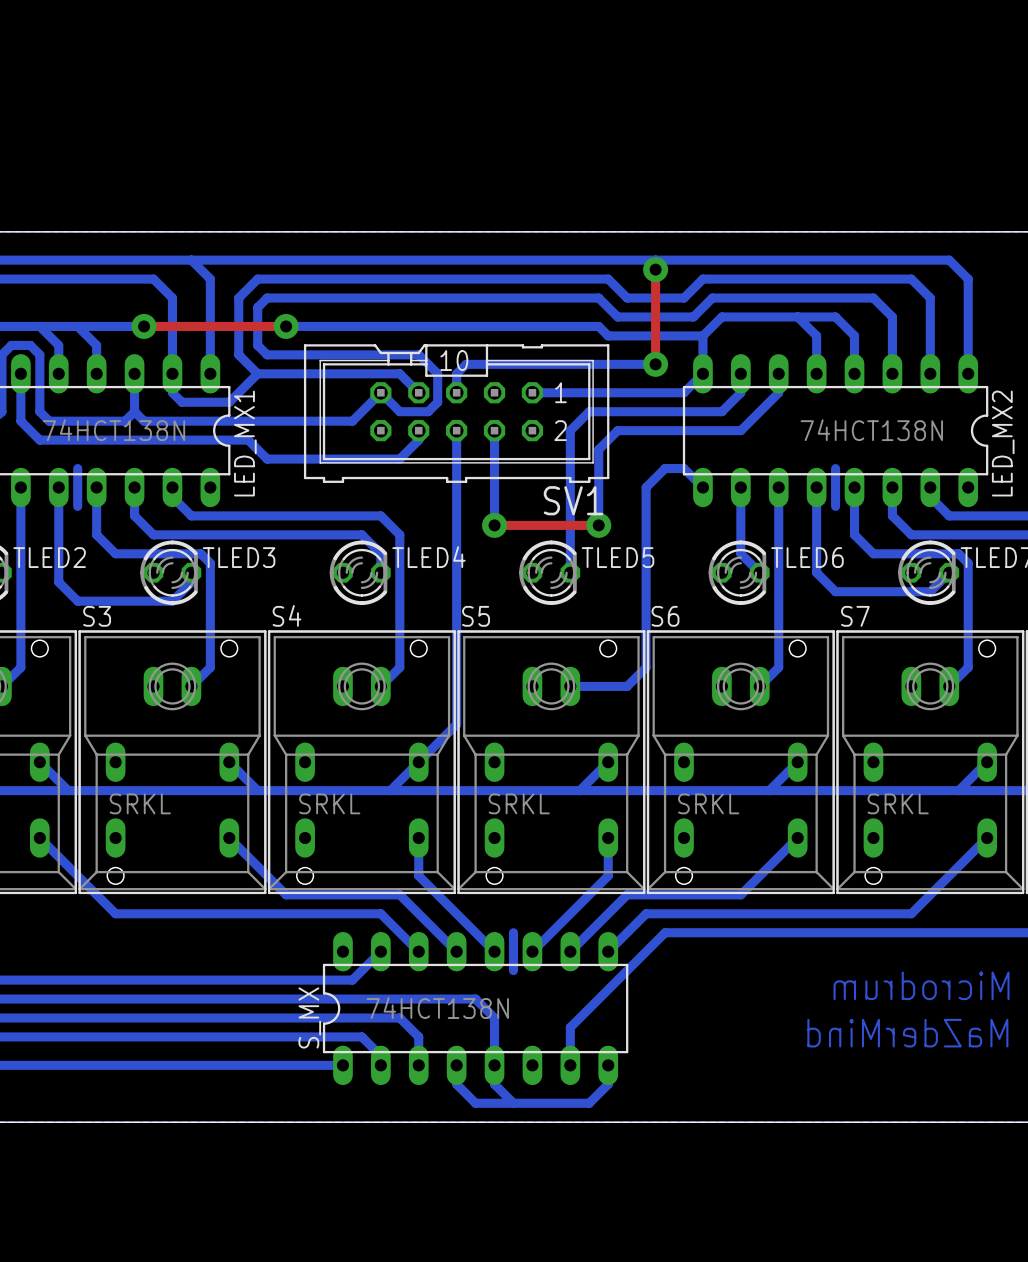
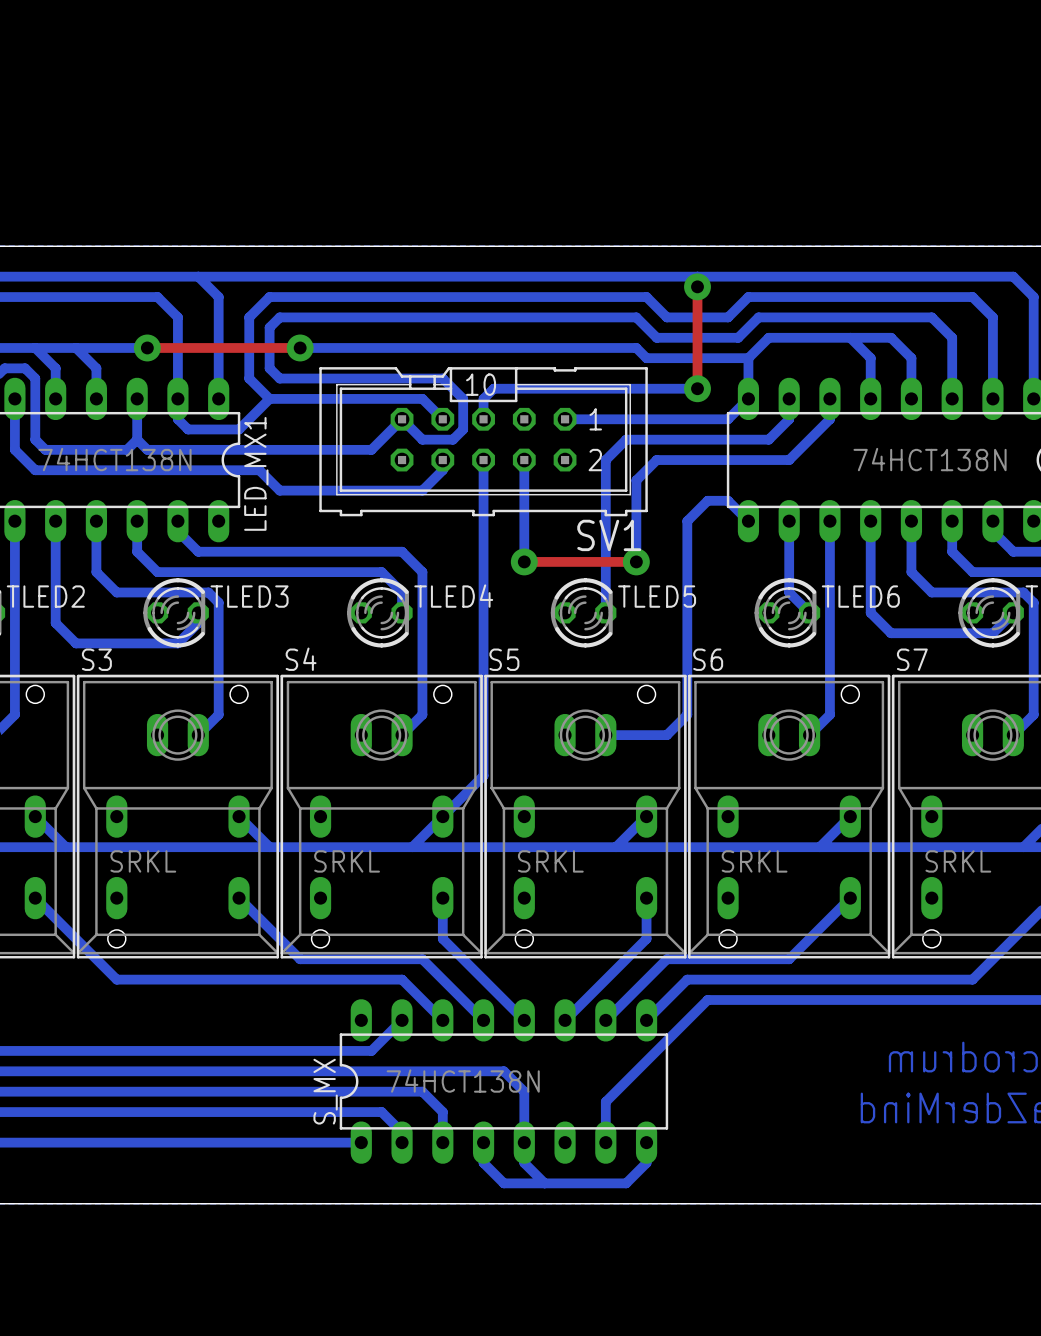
bottom track: (77, 468) (77, 506) -> none
bottom track: (835, 468) (835, 506) -> none
bottom track: (513, 932) (513, 970) -> none

